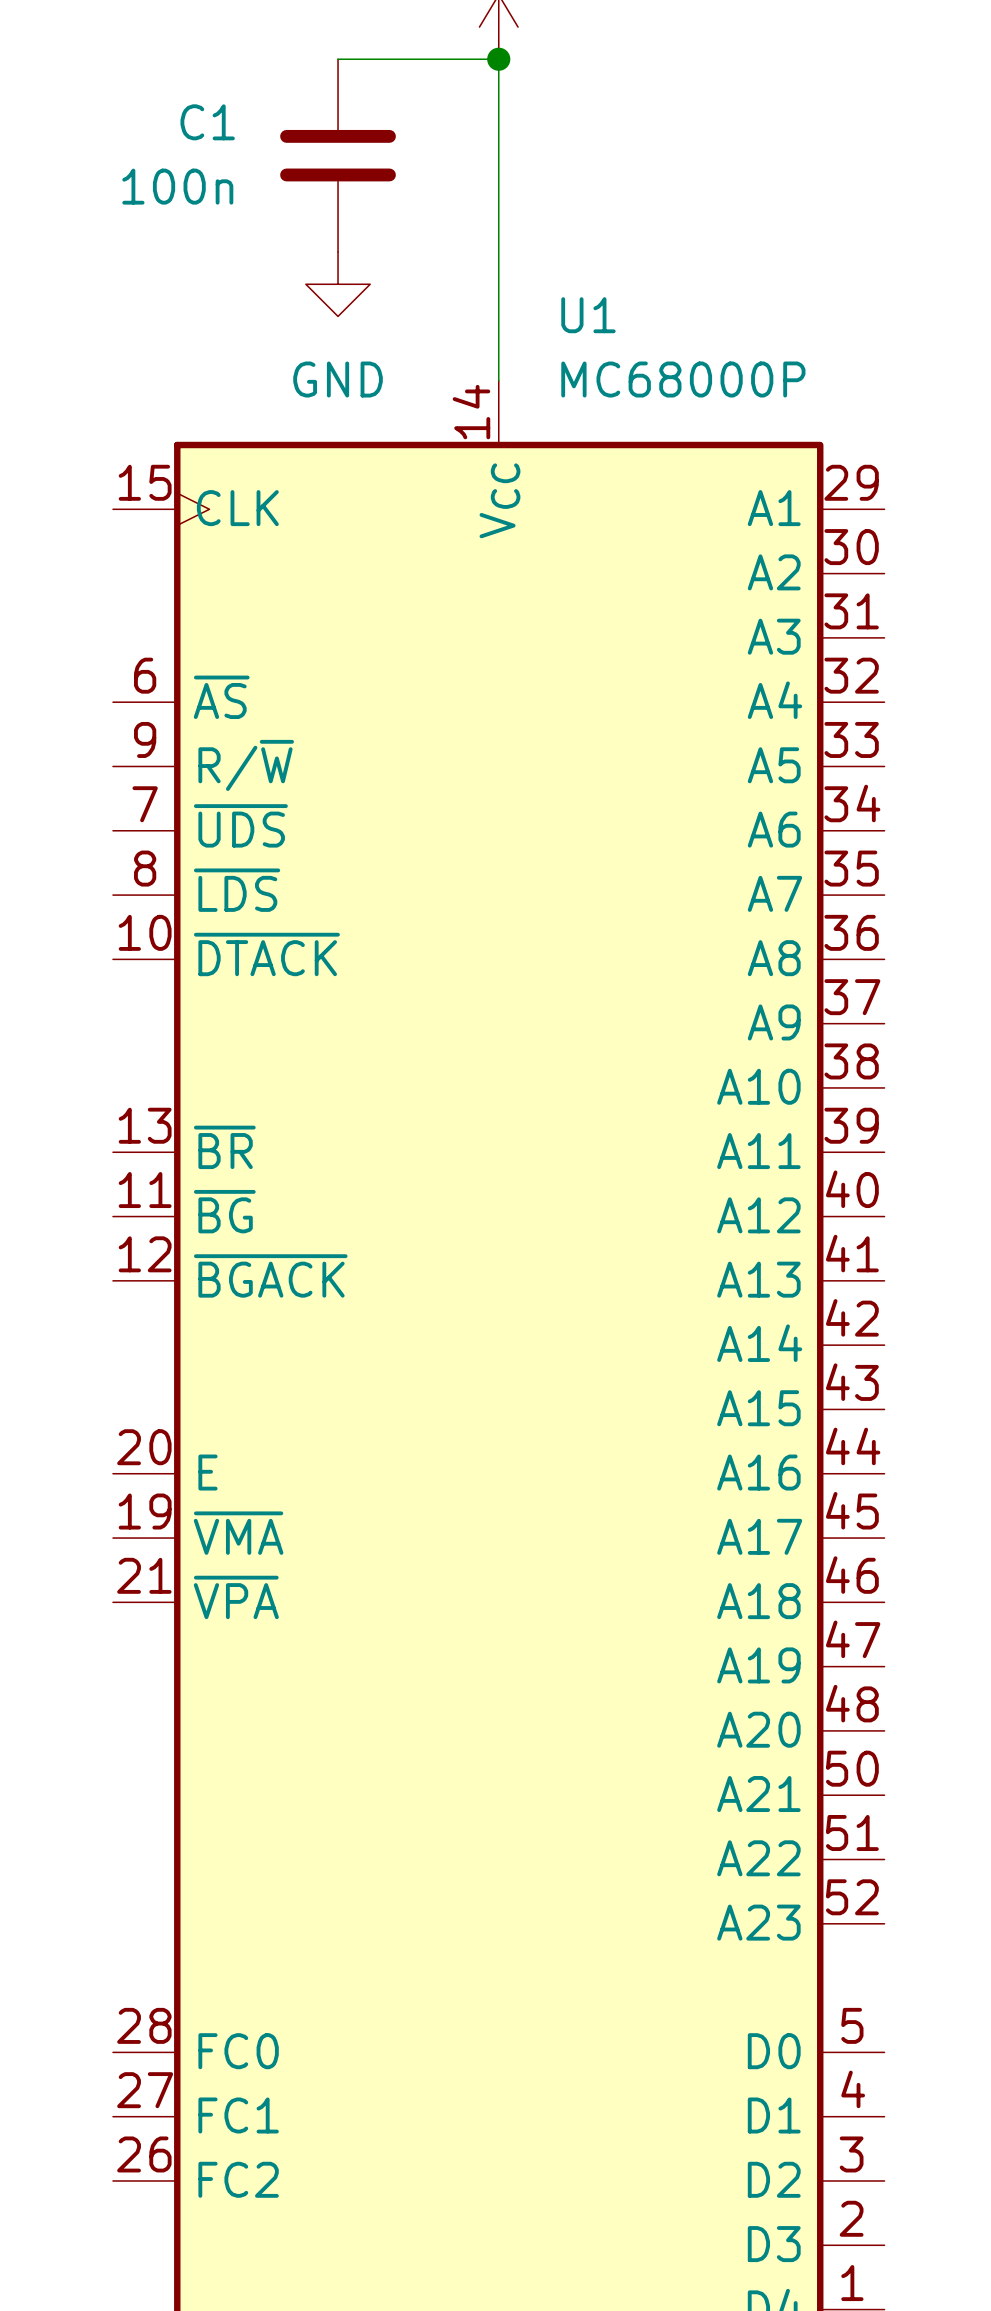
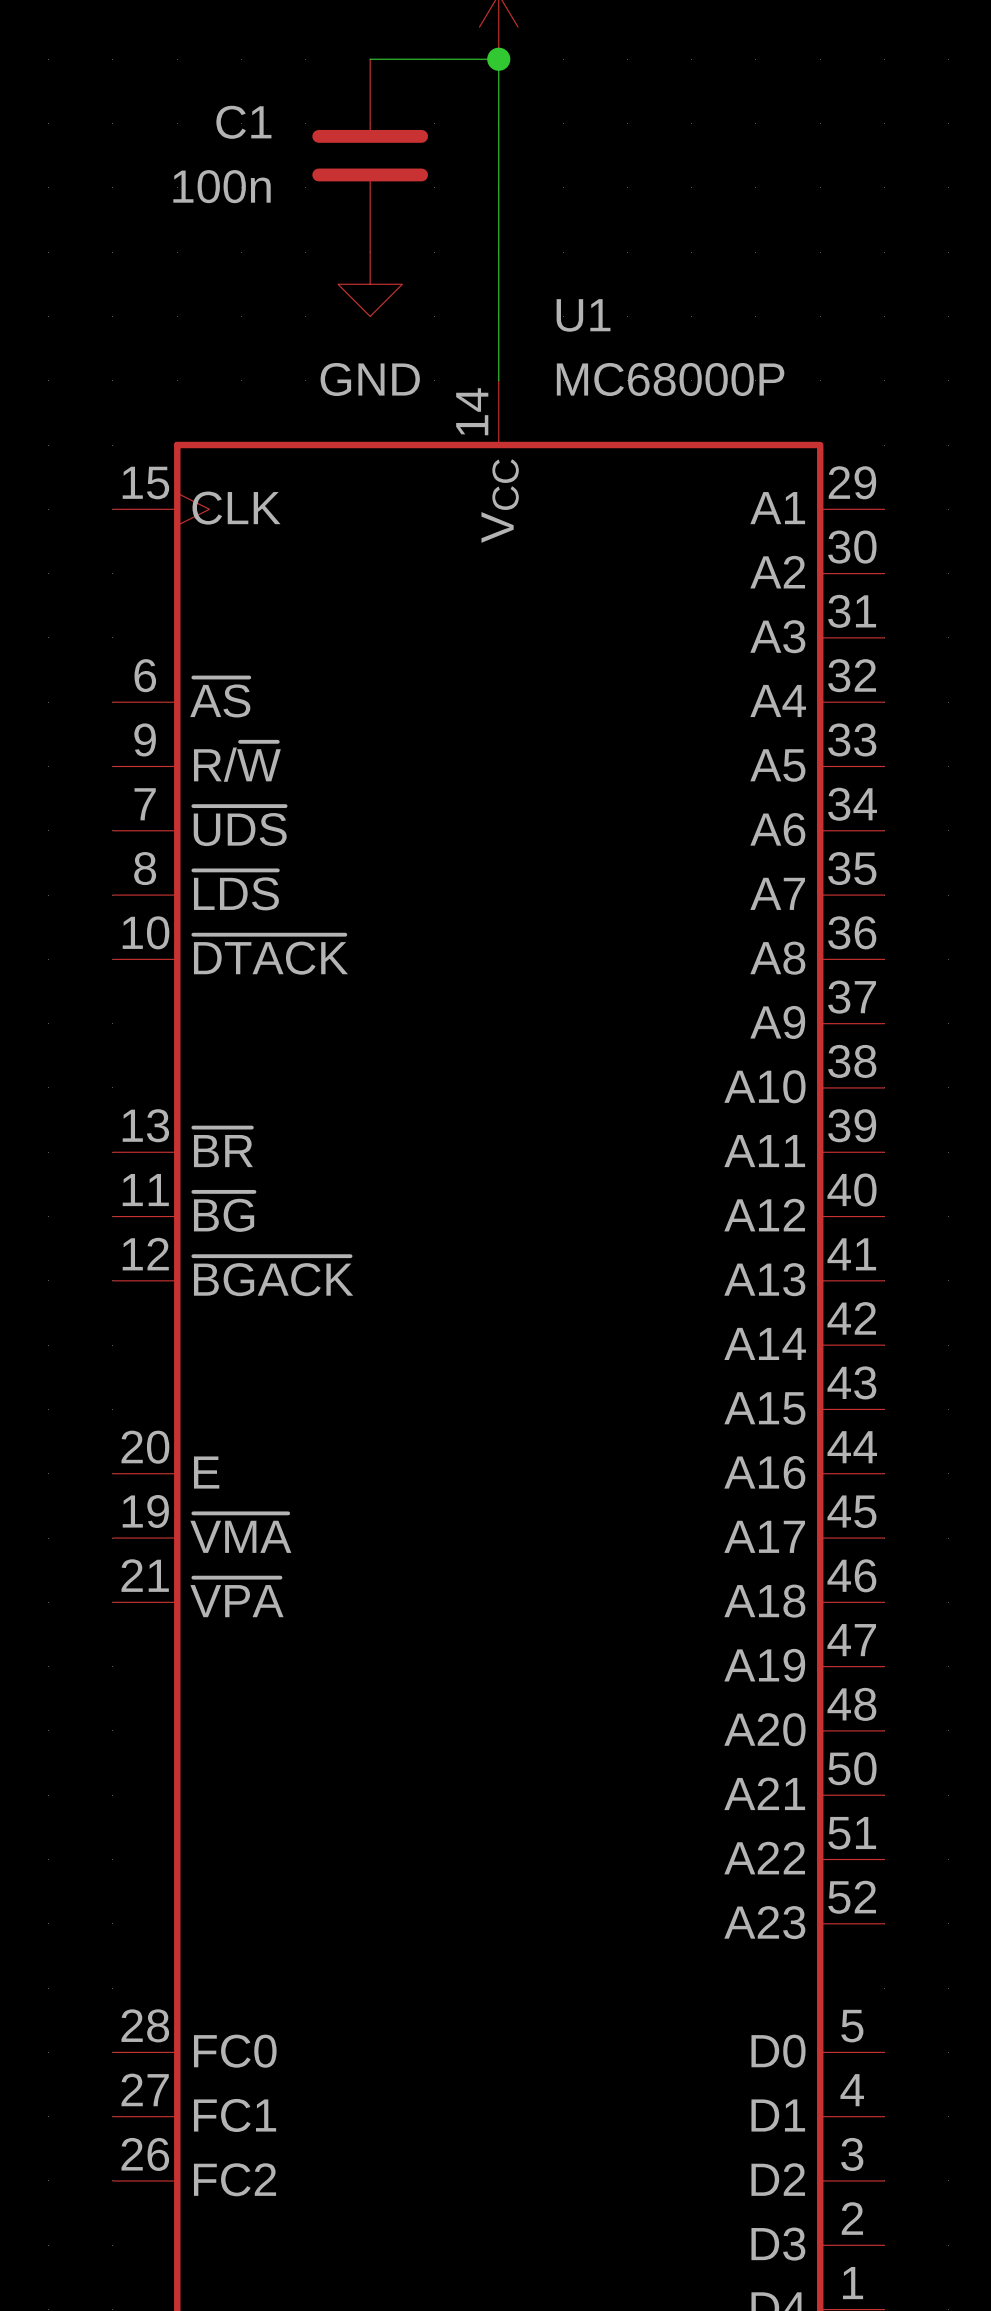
wire: (338, 59) (370, 59) -> none
C1 position: (338, 155) -> (370, 155)
power symbol position: GND (338, 284) -> GND (370, 284)

